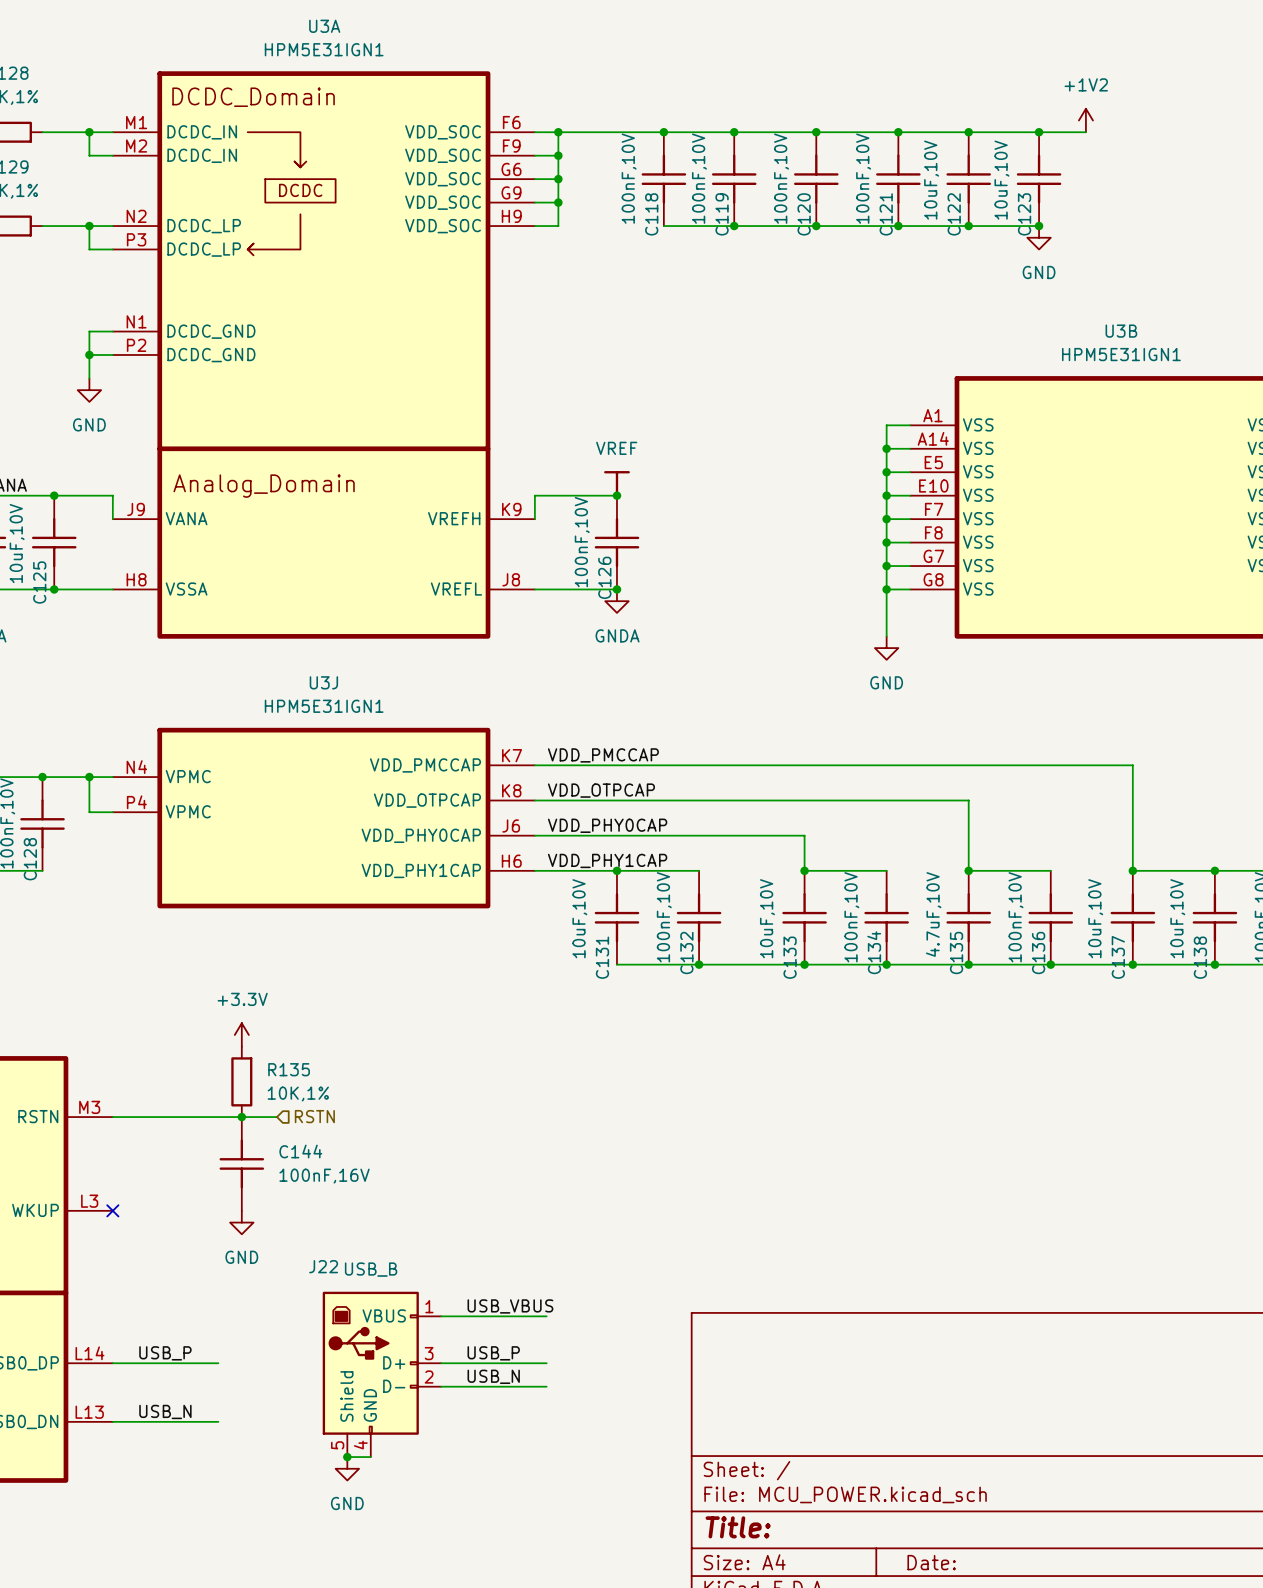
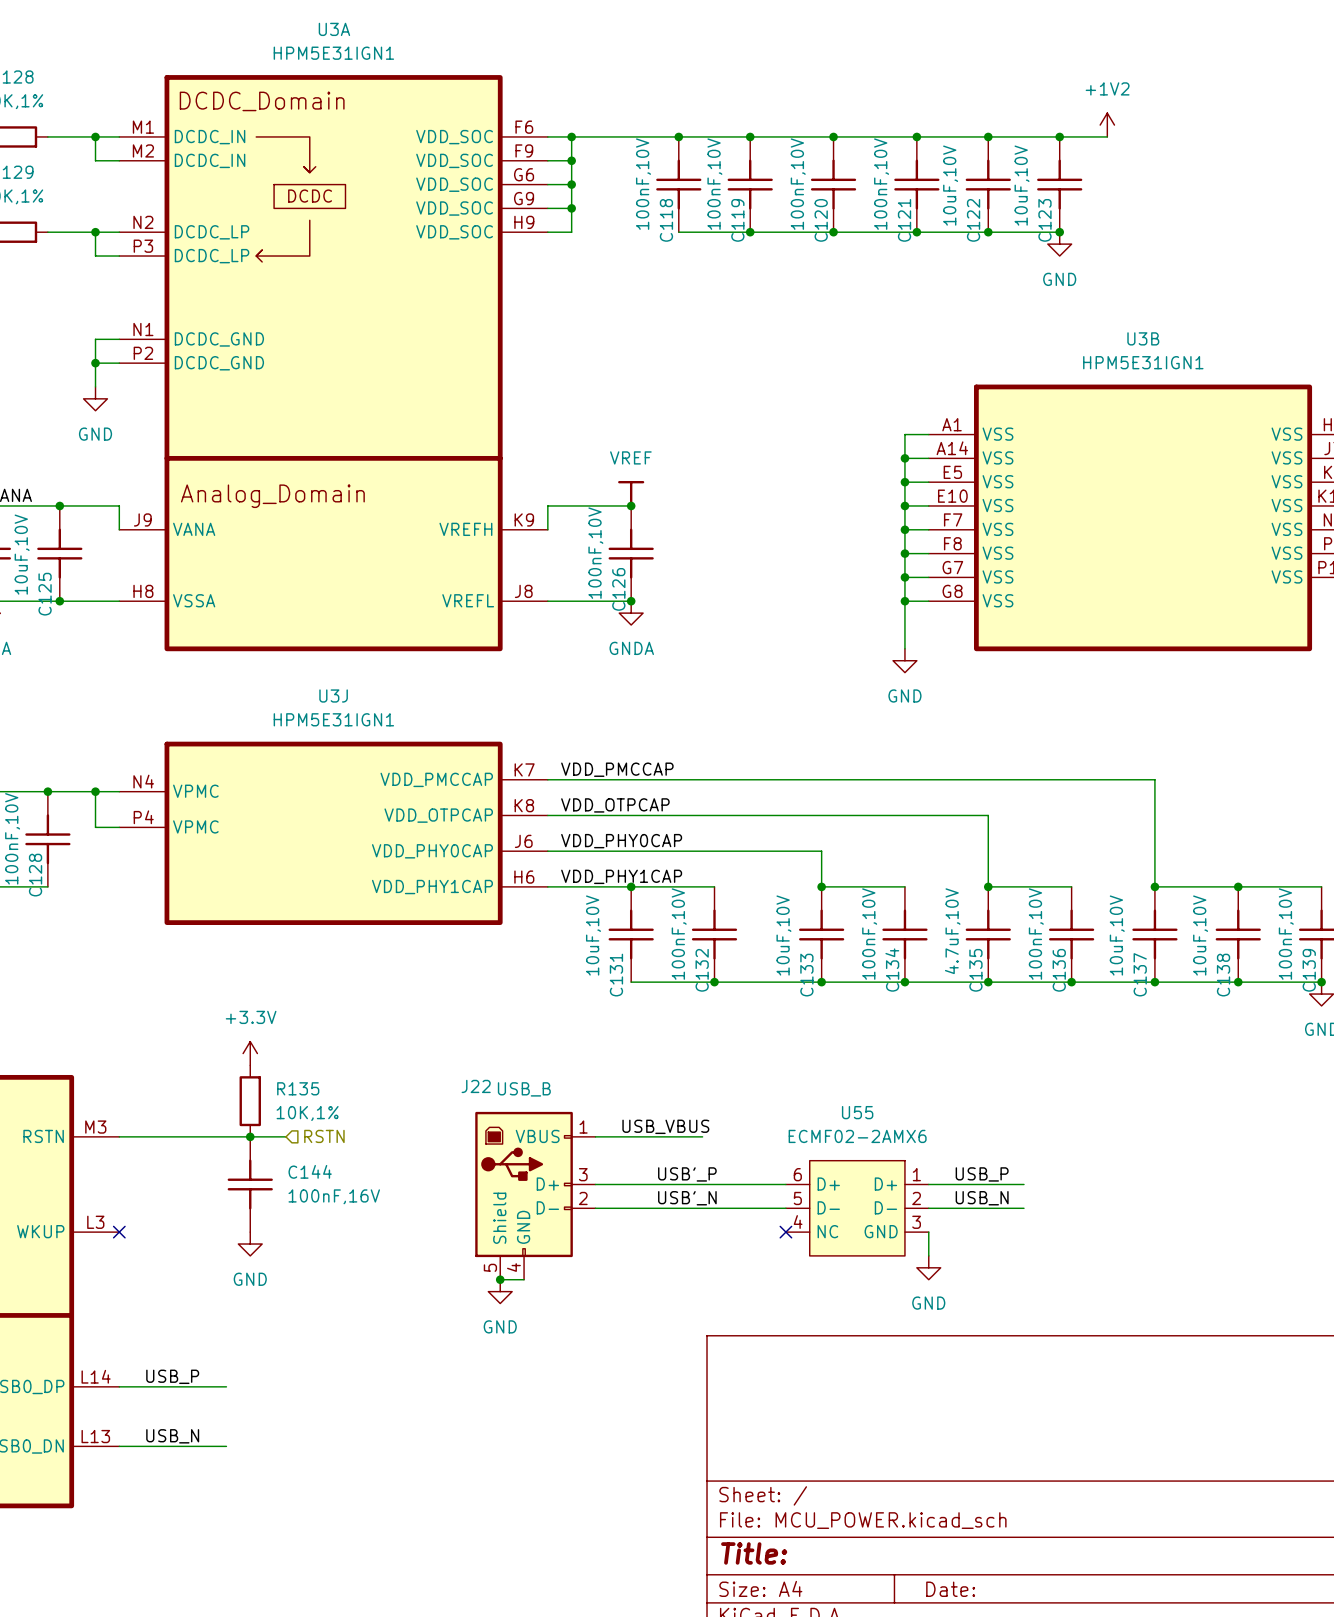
label: none -> USB_VBUS (665, 1126)
wire: none -> (595, 1136) (702, 1136)
label: none -> USB'_P (687, 1174)
label: none -> USB_P (982, 1174)
wire: none -> (595, 1184) (785, 1184)
wire: none -> (928, 1184) (1023, 1184)
label: none -> USB'_N (687, 1198)
label: none -> USB_N (982, 1198)
wire: none -> (595, 1208) (785, 1208)
U55: none -> ECMF02-2AMX6 (857, 1208)
wire: none -> (928, 1208) (1023, 1208)
no-connect mark: none -> (785, 1232)
wire: none -> (928, 1232) (928, 1255)
power symbol: none -> GND (928, 1267)
wire: none -> (500, 1279) (524, 1279)
junction: none -> (500, 1279)
power symbol: none -> GND (500, 1291)
label: USB_VBUS (510, 1306) -> none
wire: (441, 1316) (546, 1316) -> none
label: USB_P (493, 1353) -> none
wire: (441, 1363) (546, 1363) -> none
J22 position: (381, 1374) -> (535, 1195)
label: USB_N (493, 1376) -> none
wire: (441, 1386) (546, 1386) -> none
wire: (347, 1457) (370, 1457) -> none
junction: (347, 1457) -> none
power symbol: GND (347, 1468) -> none

